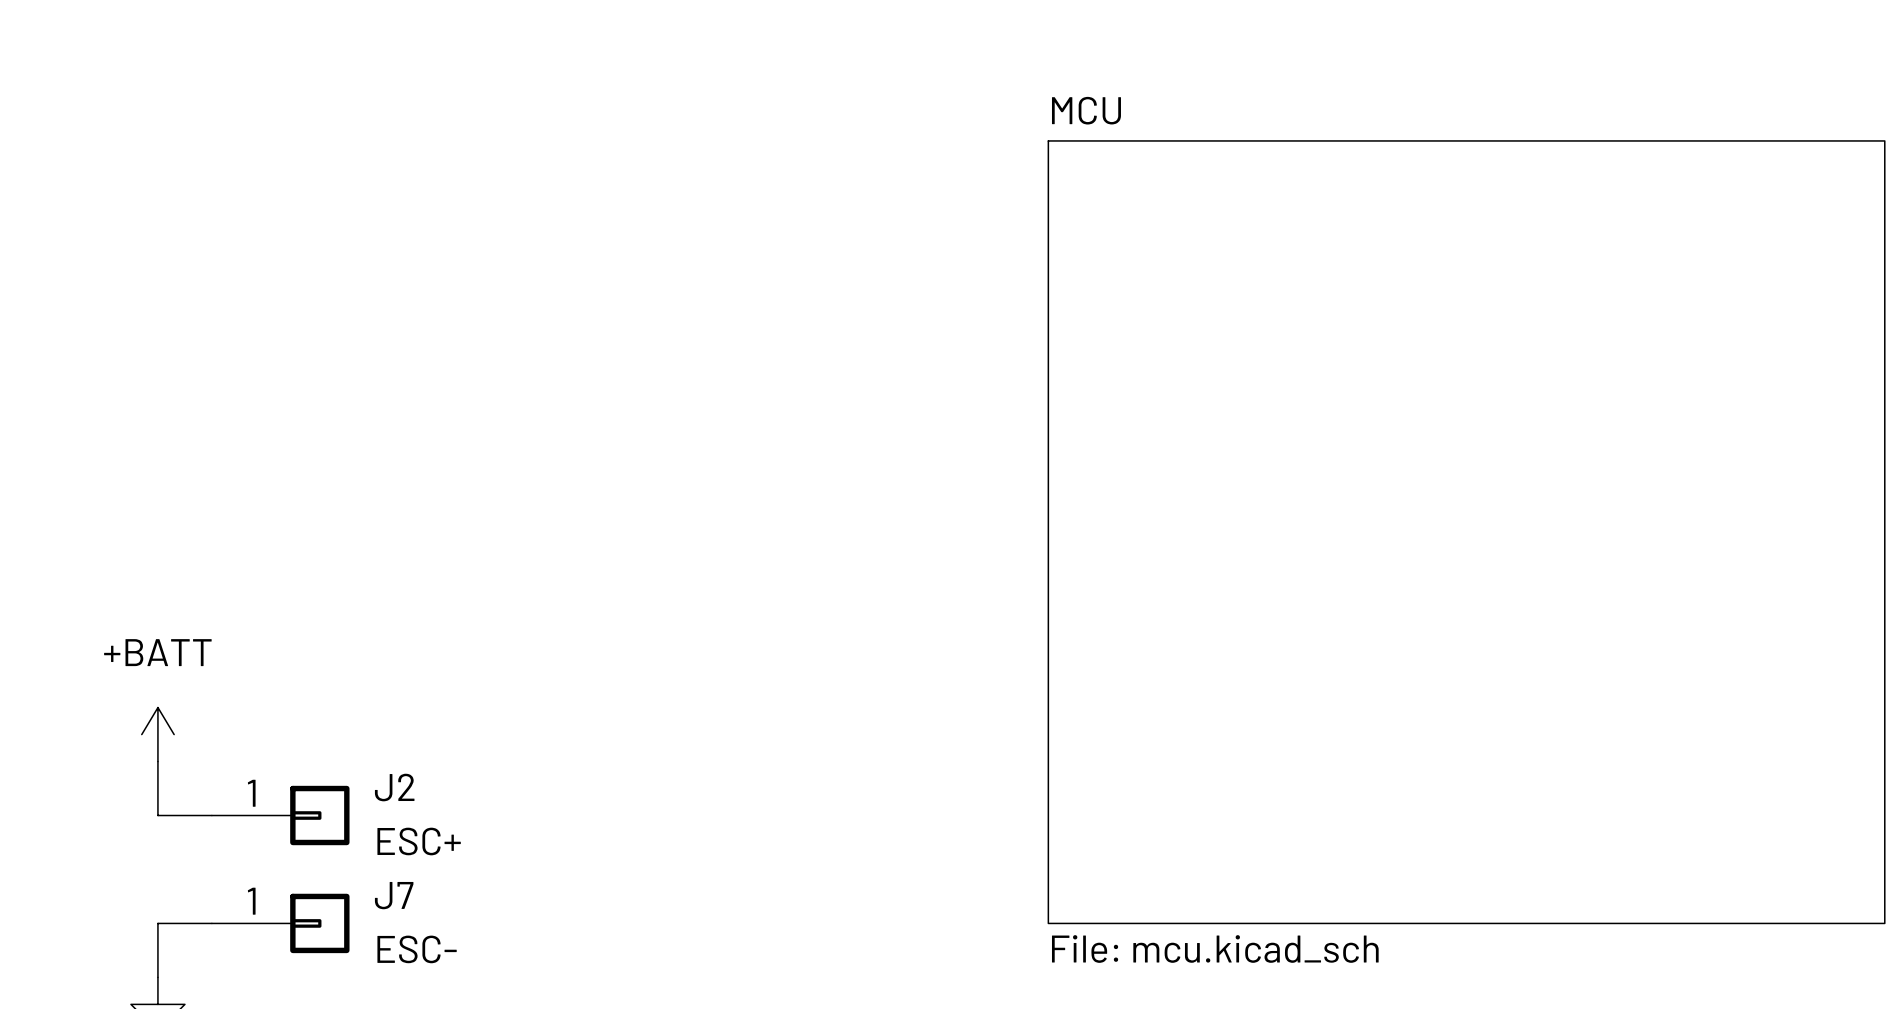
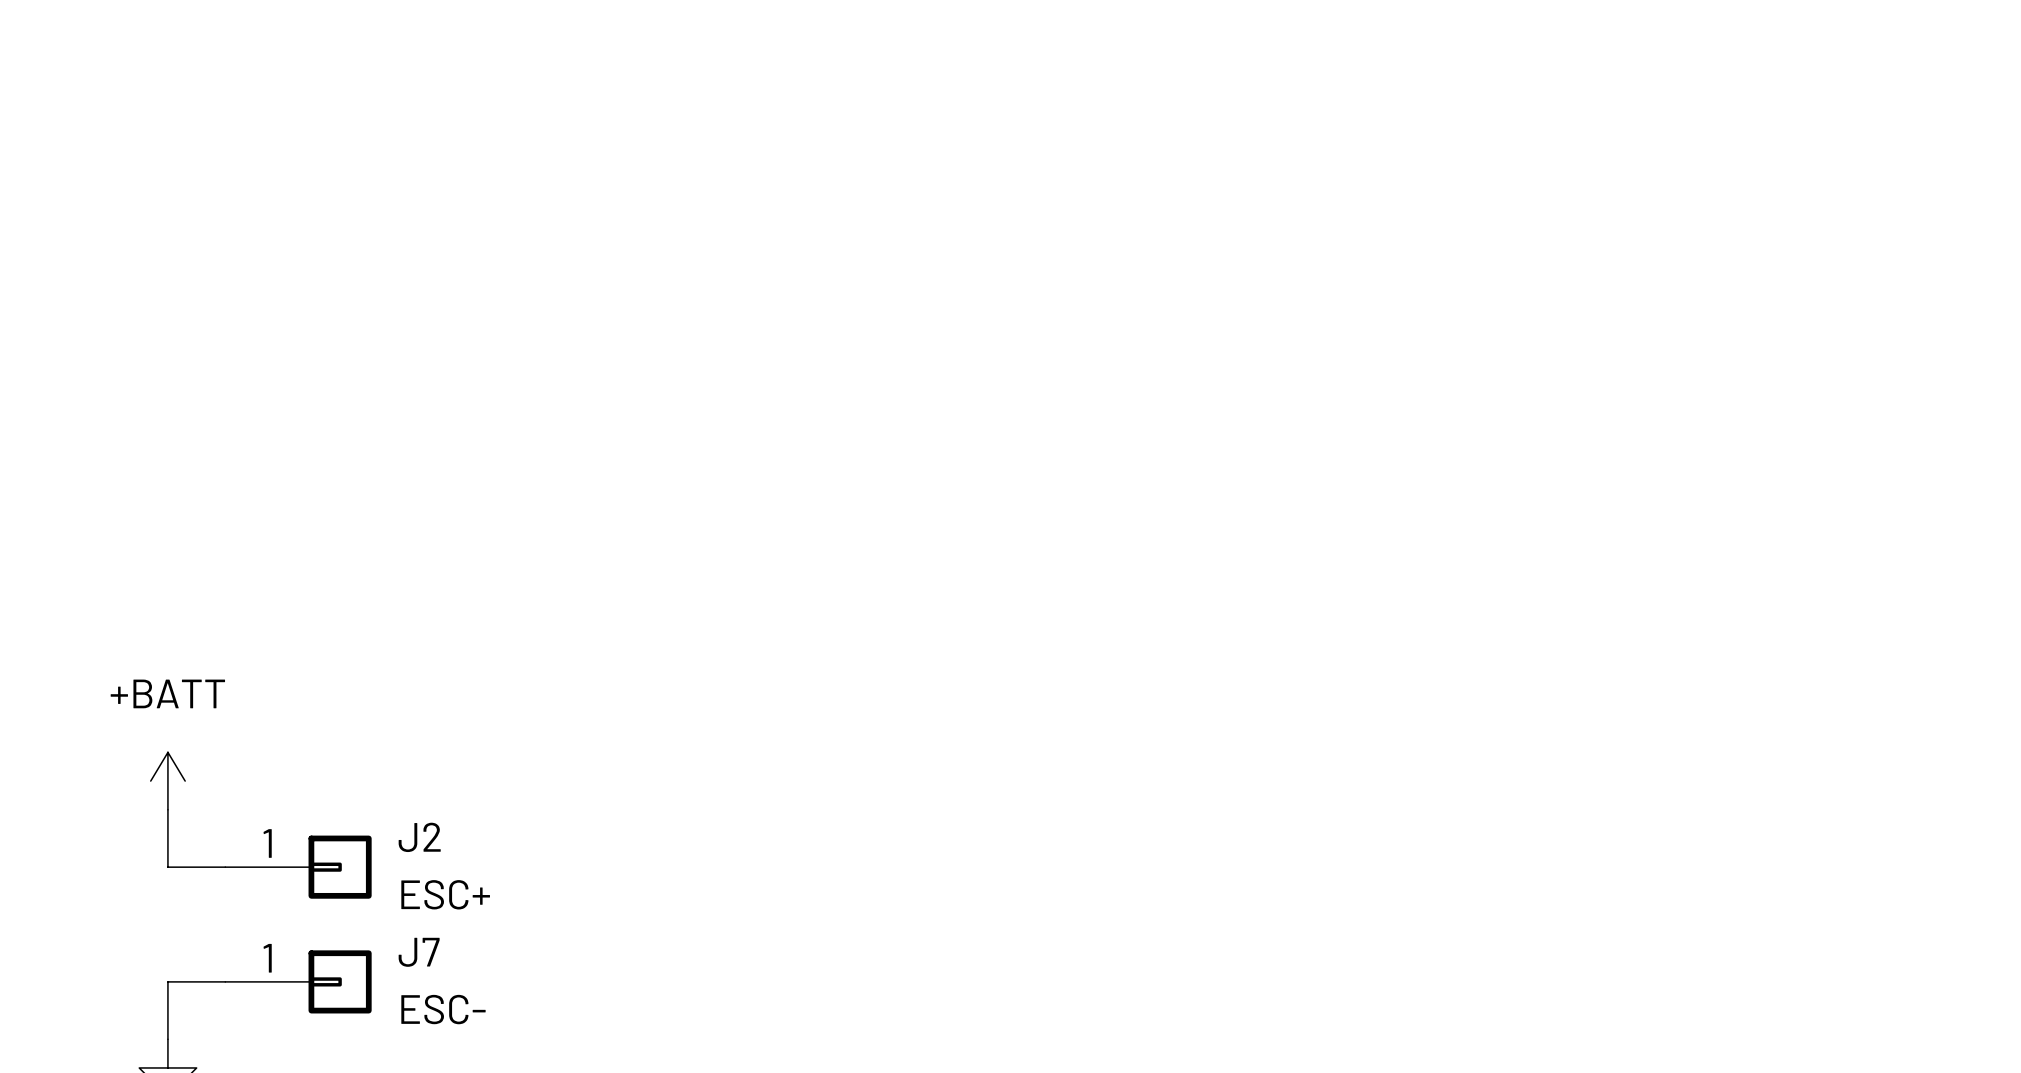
sheet MCU: File: mcu.kicad_sch (1466, 532) -> none

